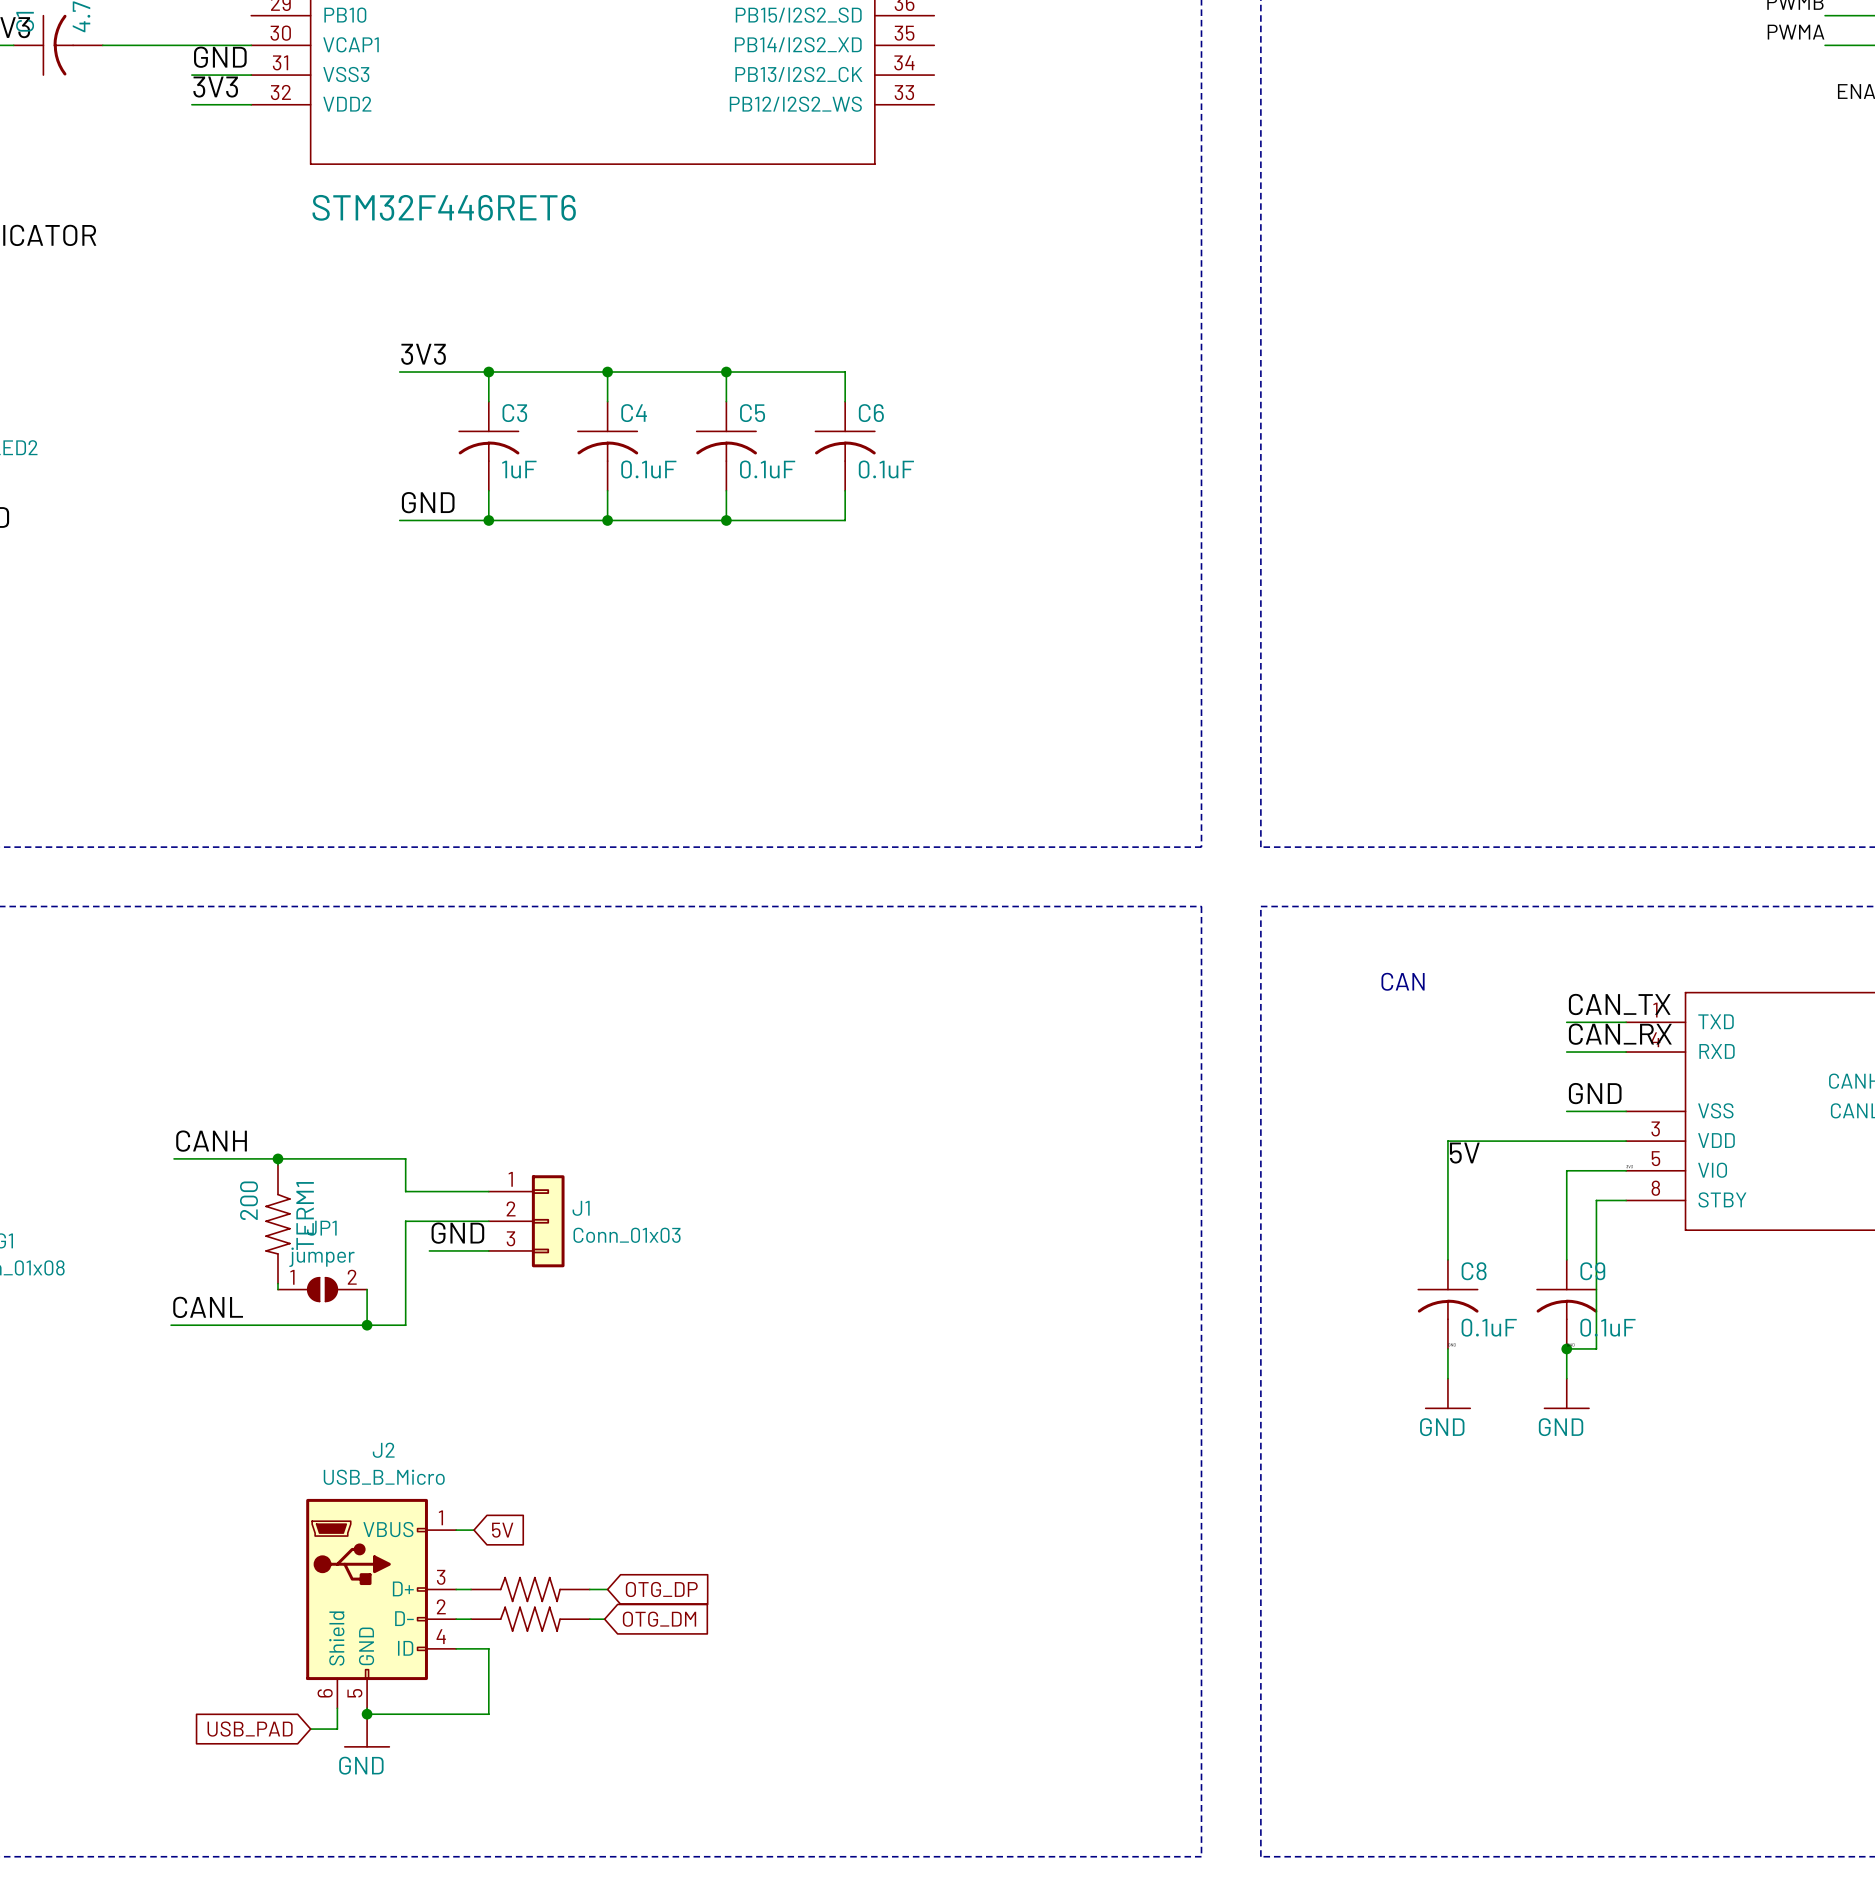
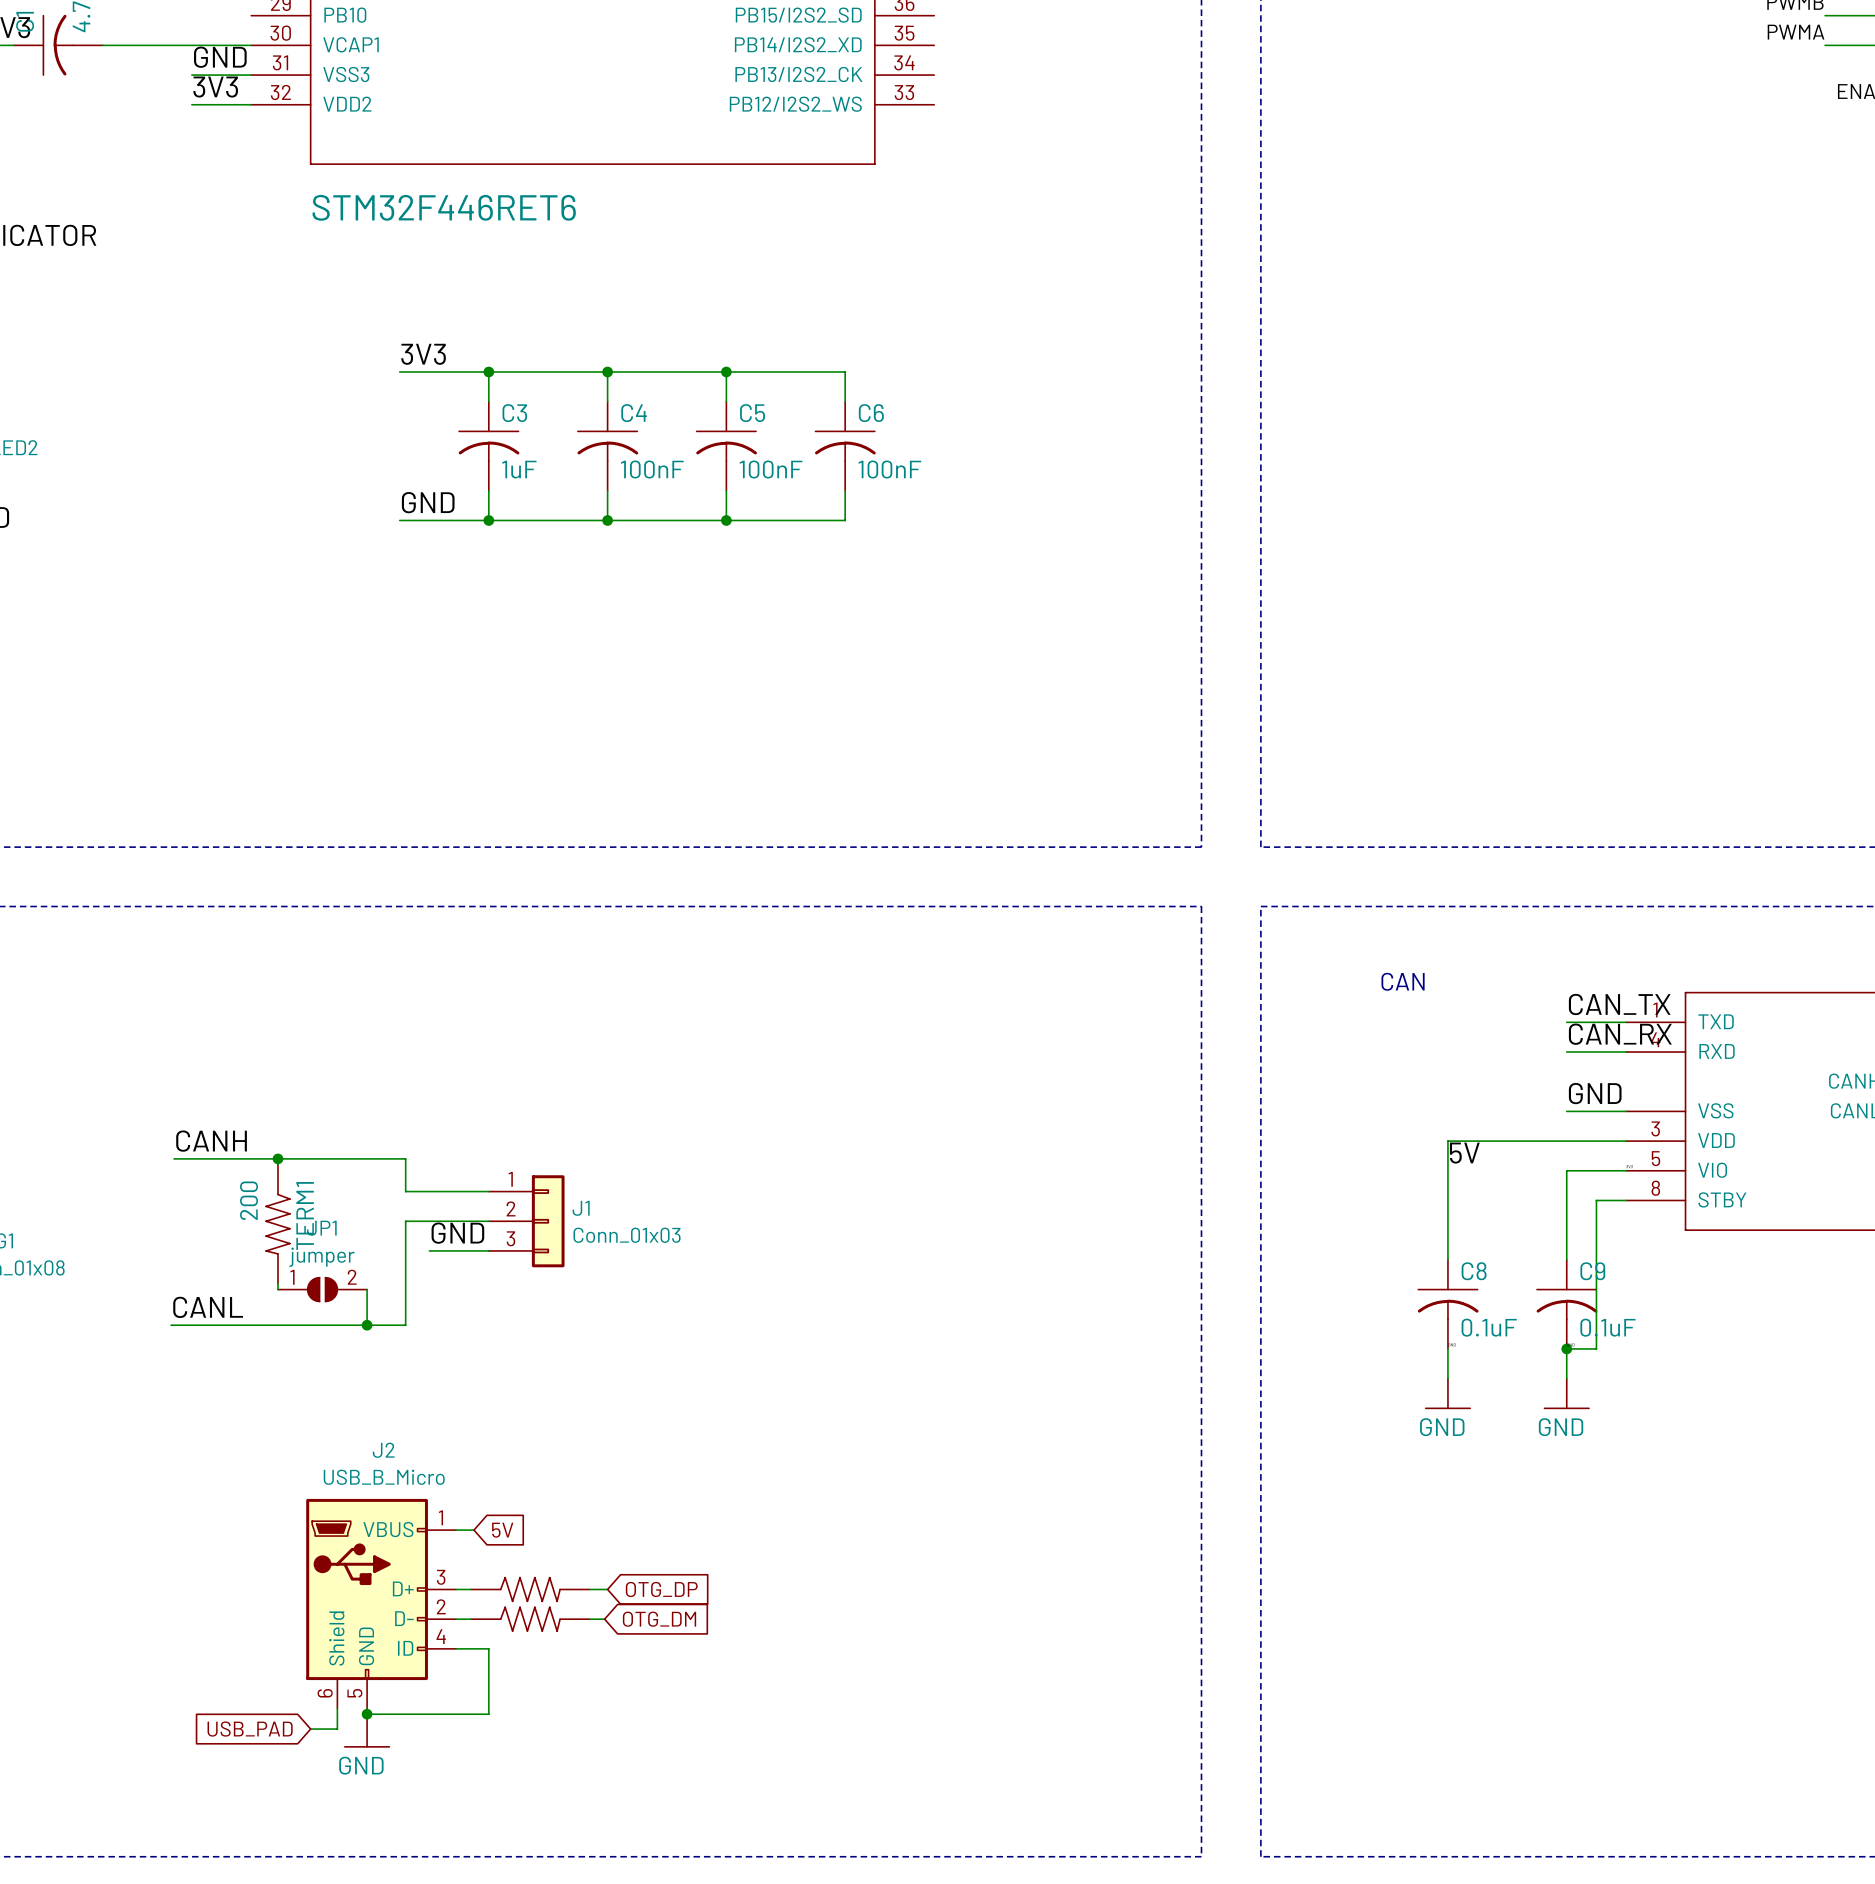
C4 value: 0.1uF (648, 469) -> 100nF (652, 469)
C5 value: 0.1uF (767, 469) -> 100nF (771, 469)
C6 value: 0.1uF (886, 469) -> 100nF (889, 469)

